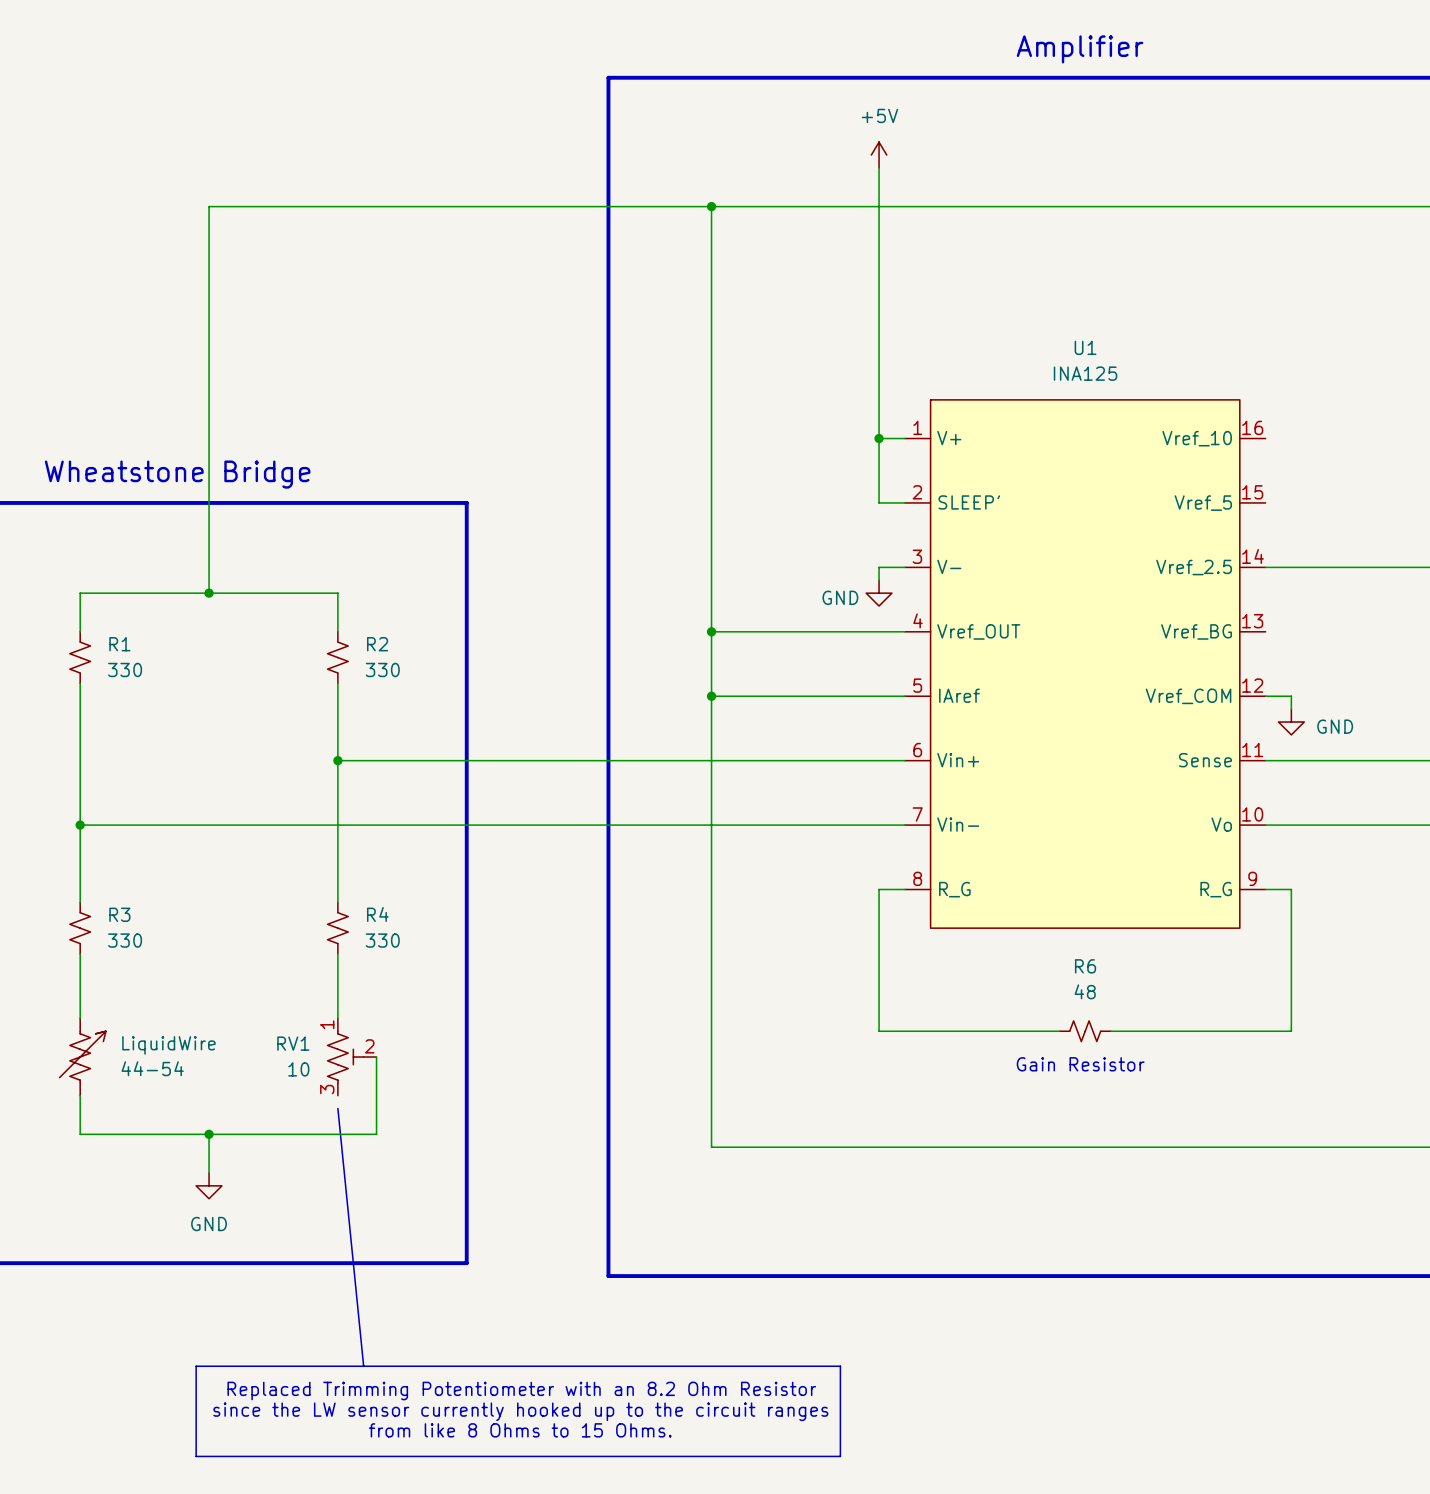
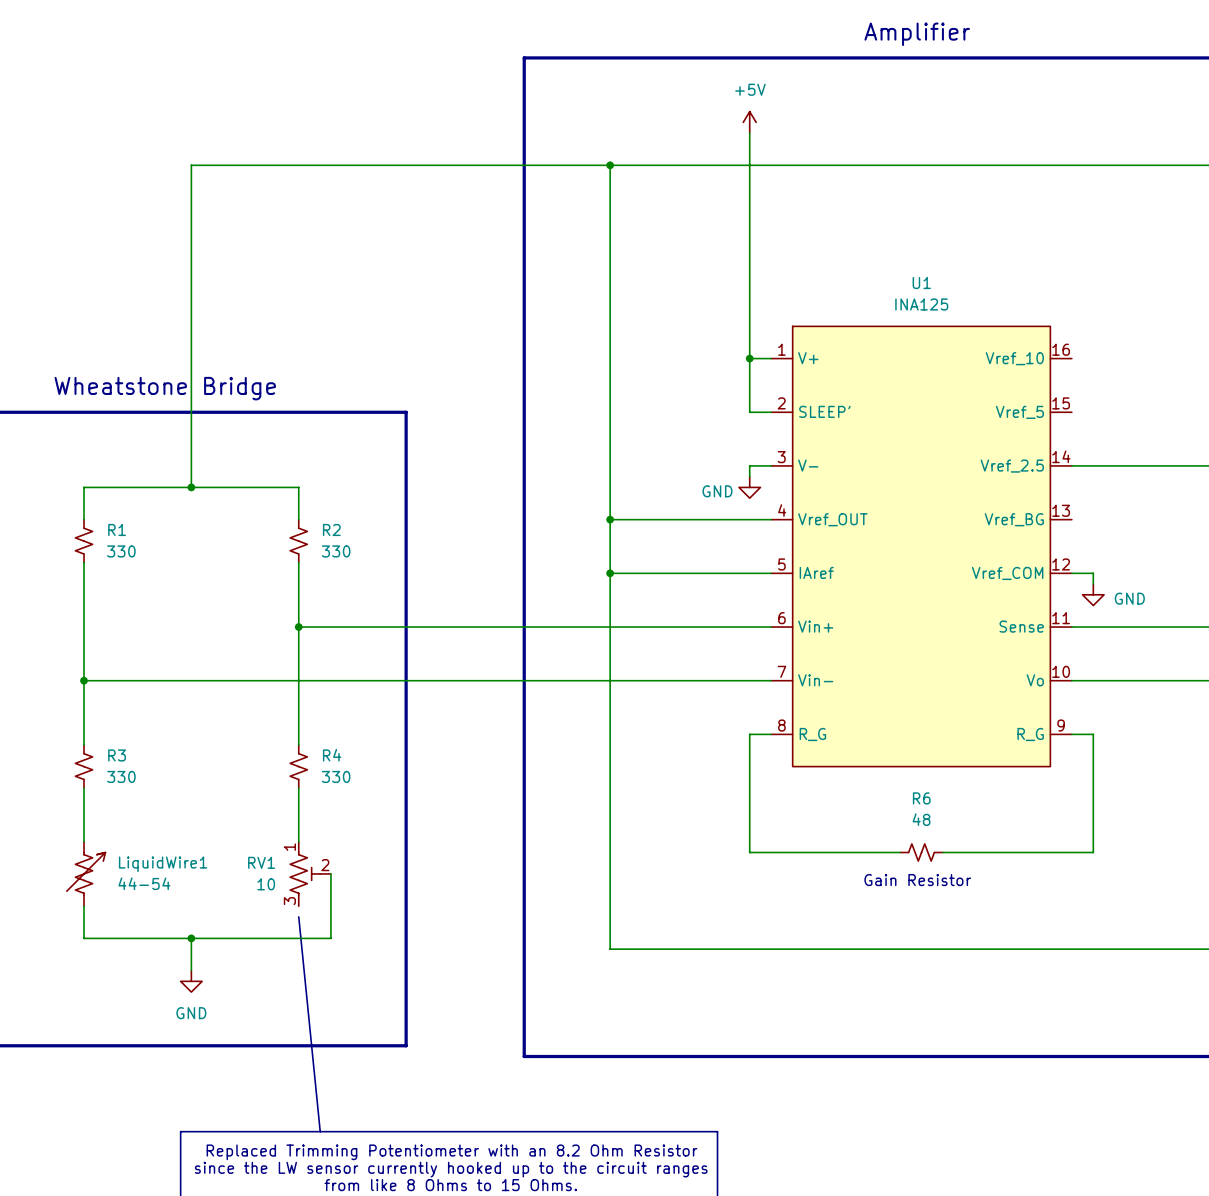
LiquidWire name: LiquidWire (168, 1045) -> LiquidWire1 (163, 864)

